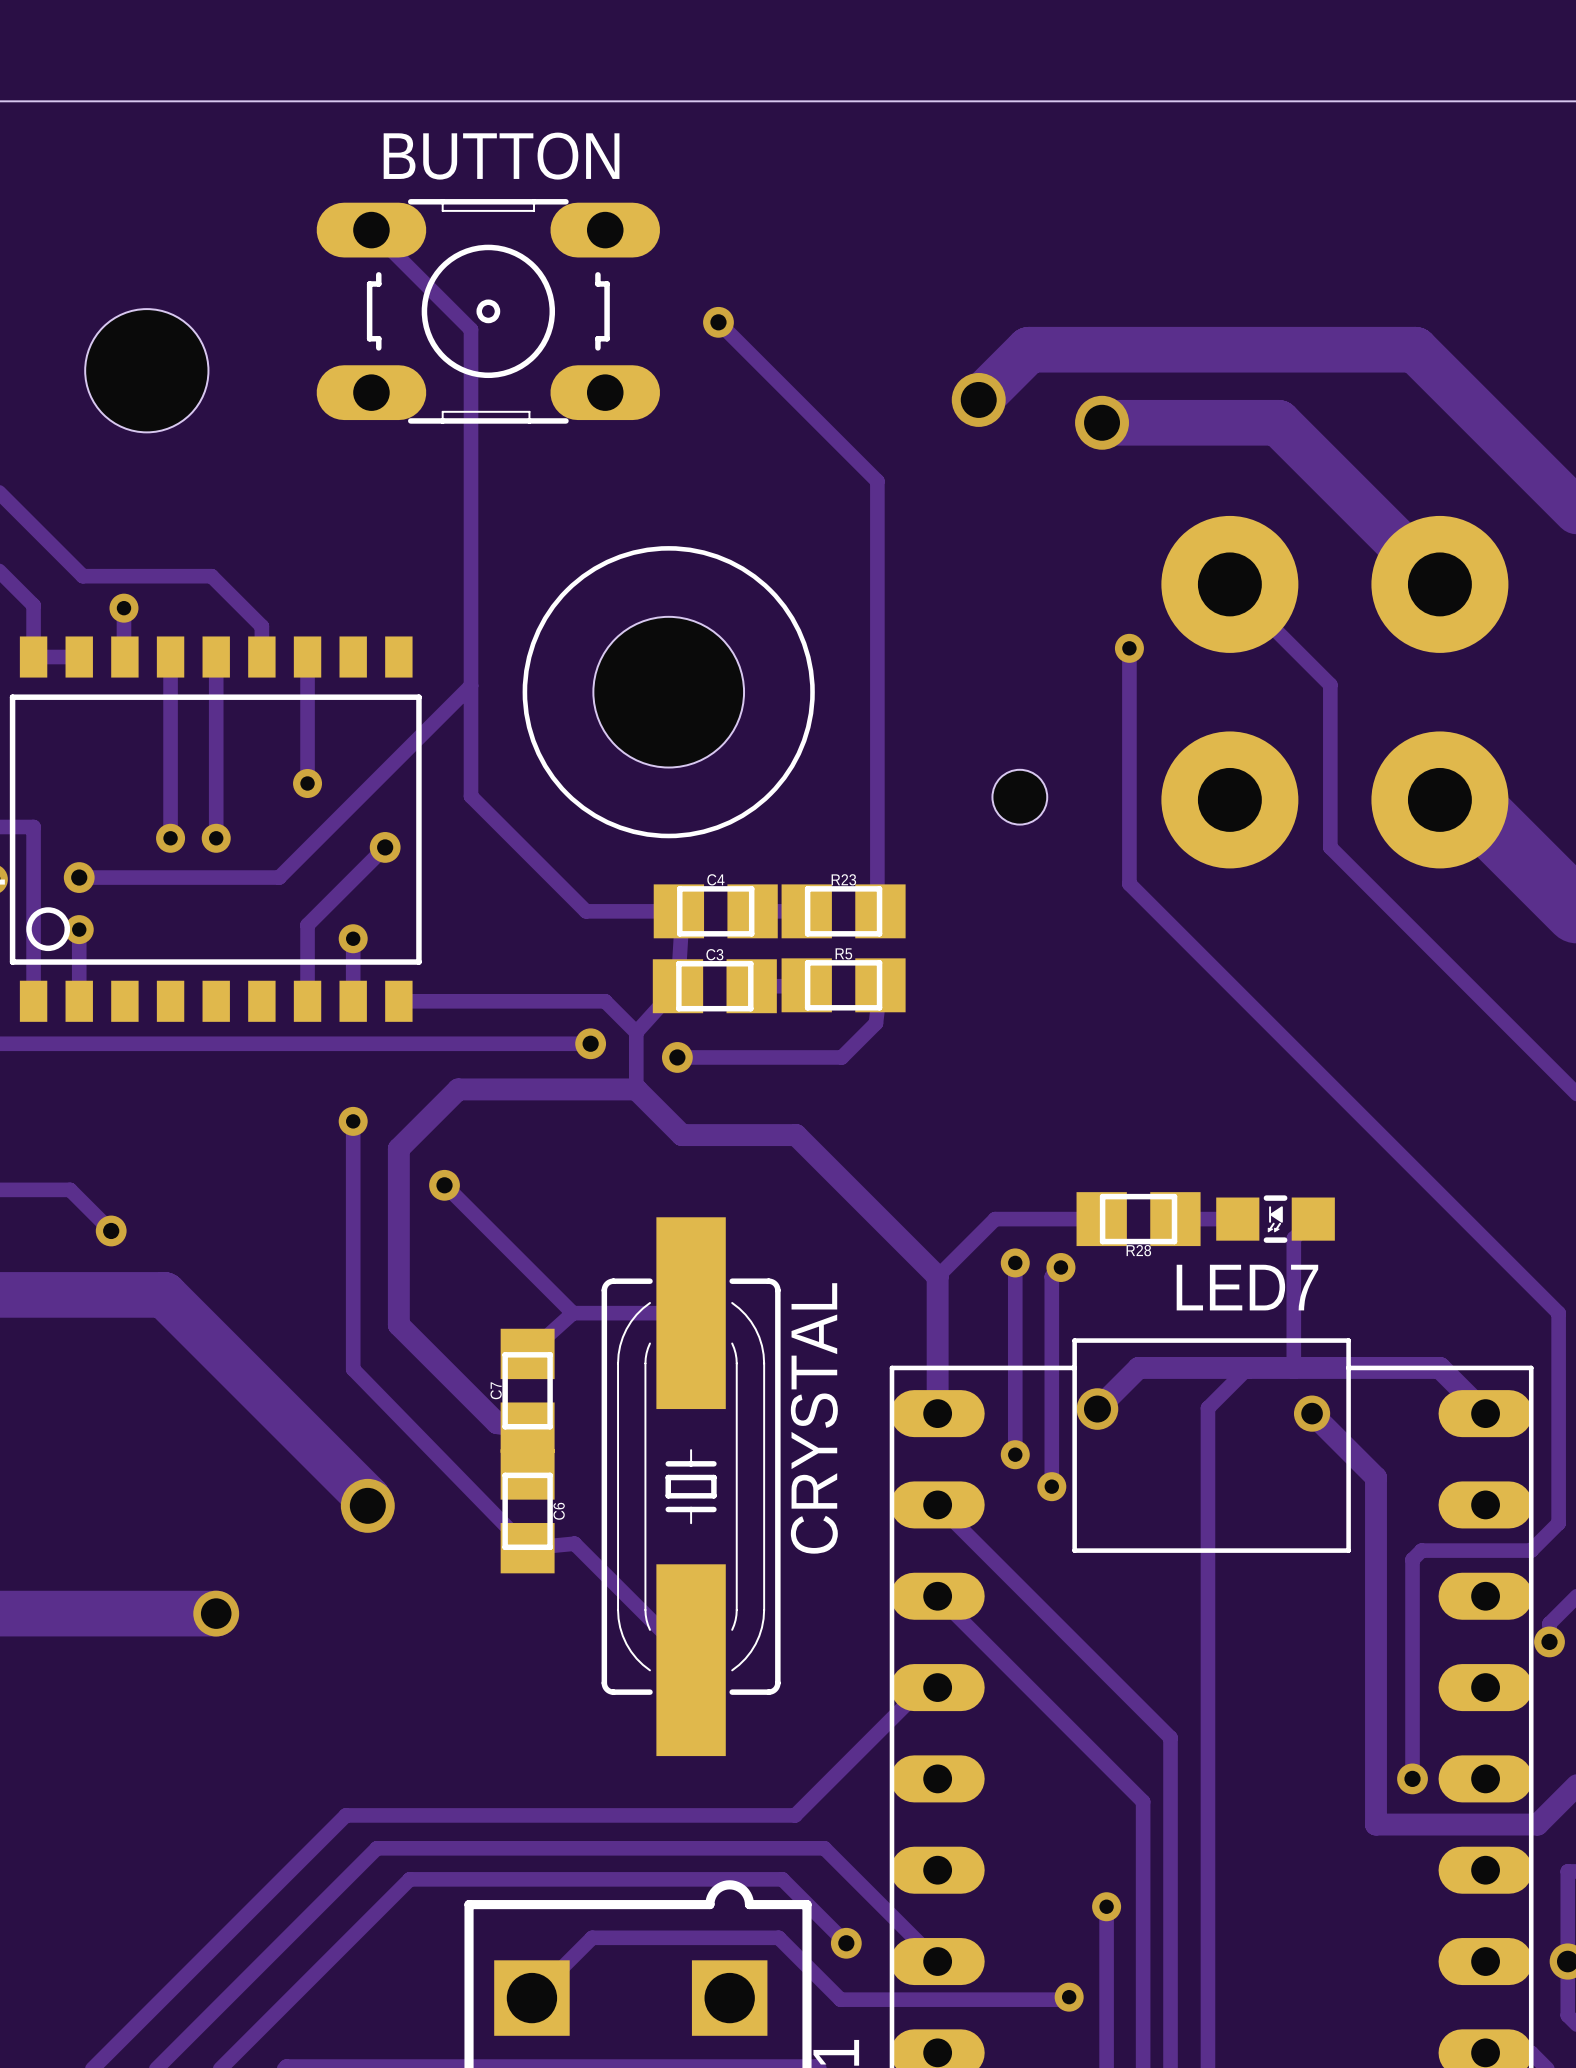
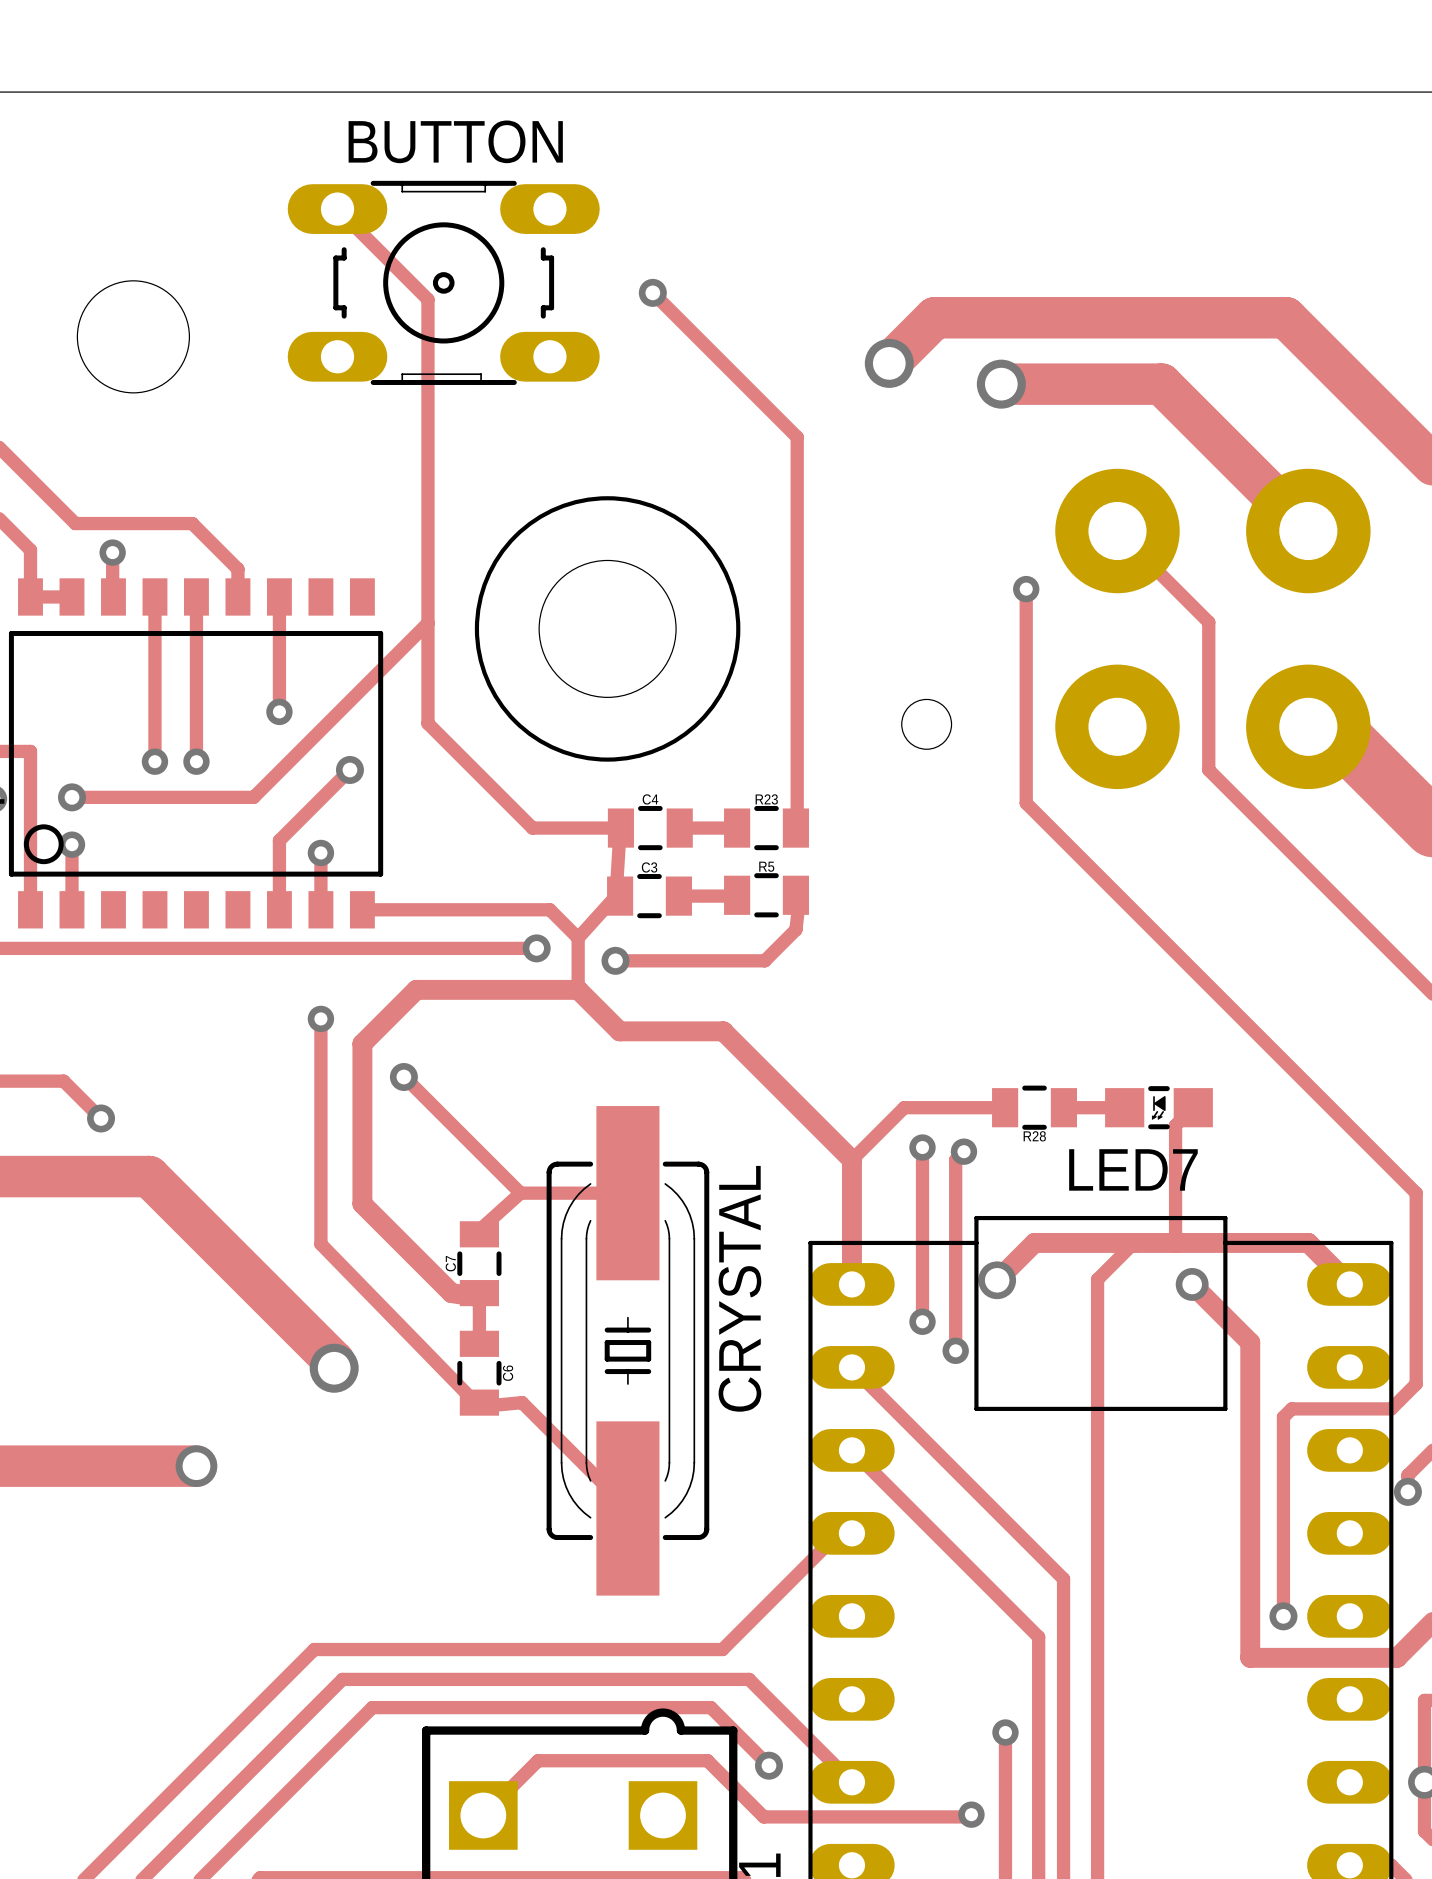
C4 footprint: [653, 884, 778, 939] -> [607, 805, 693, 851]
R23 footprint: [781, 884, 906, 939] -> [724, 805, 809, 851]
R5 footprint: [781, 958, 906, 1013] -> [724, 873, 809, 918]
C3 footprint: [652, 959, 777, 1014] -> [607, 874, 692, 919]
R28 footprint: [1076, 1192, 1201, 1247] -> [992, 1085, 1077, 1130]
C7 footprint: [500, 1328, 555, 1453] -> [457, 1221, 502, 1307]
C6 footprint: [500, 1449, 555, 1574] -> [457, 1330, 502, 1416]

